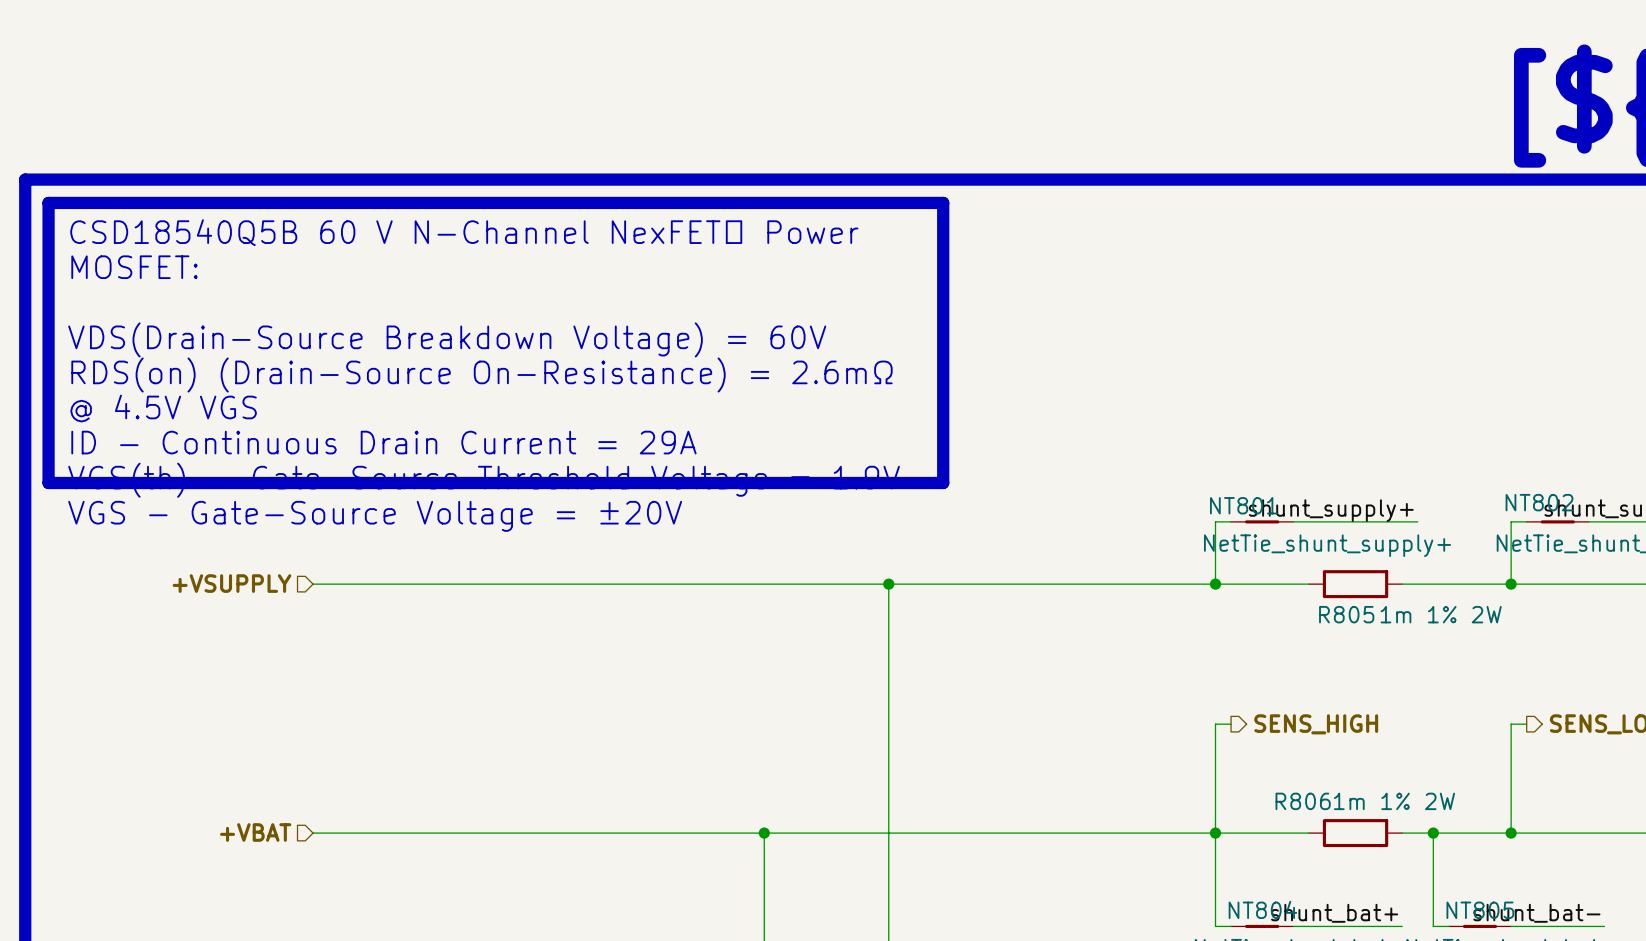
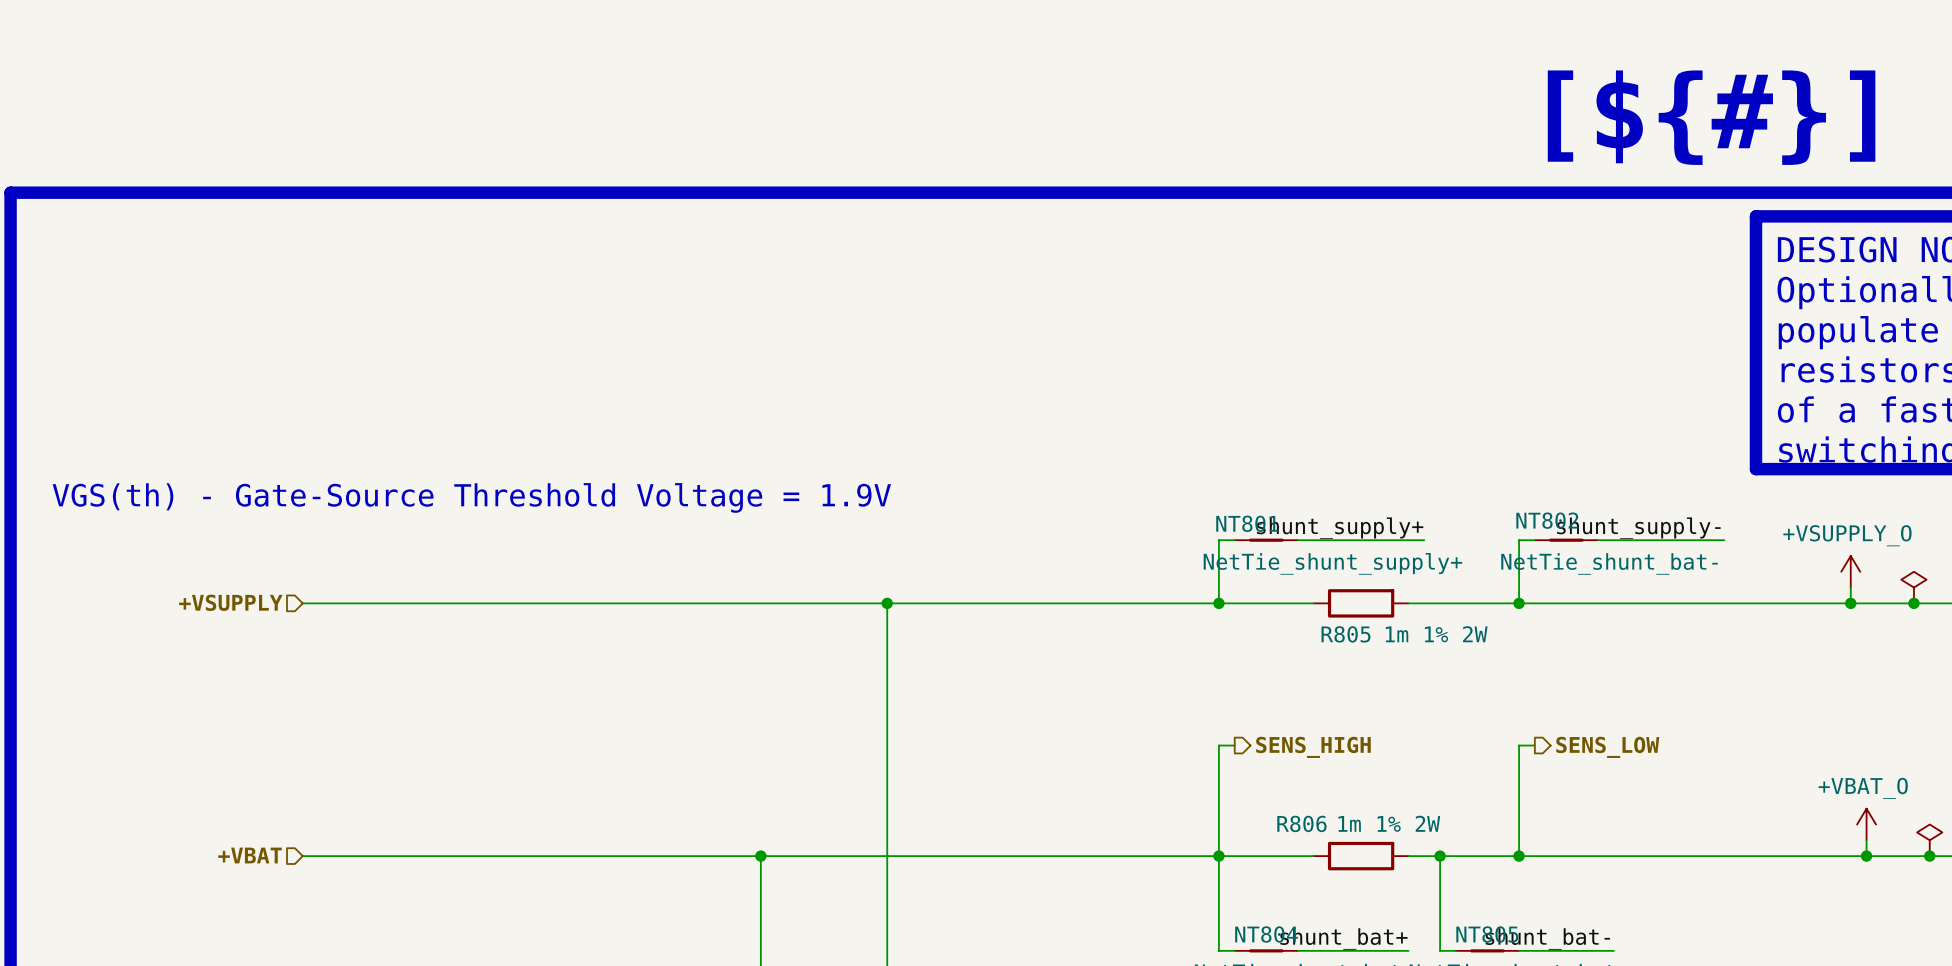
line: (48, 202) (943, 202) (943, 483) (48, 483) (48, 202) -> none
text: CSD18540Q5B 60 V N-Channel NexFET™ Power (464, 232) -> none
text: MOSFET: (134, 267) -> none
text: VDS(Drain-Source Breakdown Voltage) = 60V (447, 339) -> none
text: RDS(on) (Drain-Source On-Resistance) = 2.6mΩ (481, 375) -> none
text: @ 4.5V VGS (163, 408) -> none
text: ID - Continuous Drain Current = 29A (383, 442) -> none
text: VGS - Gate-Source Voltage = ±20V (375, 516) -> none

